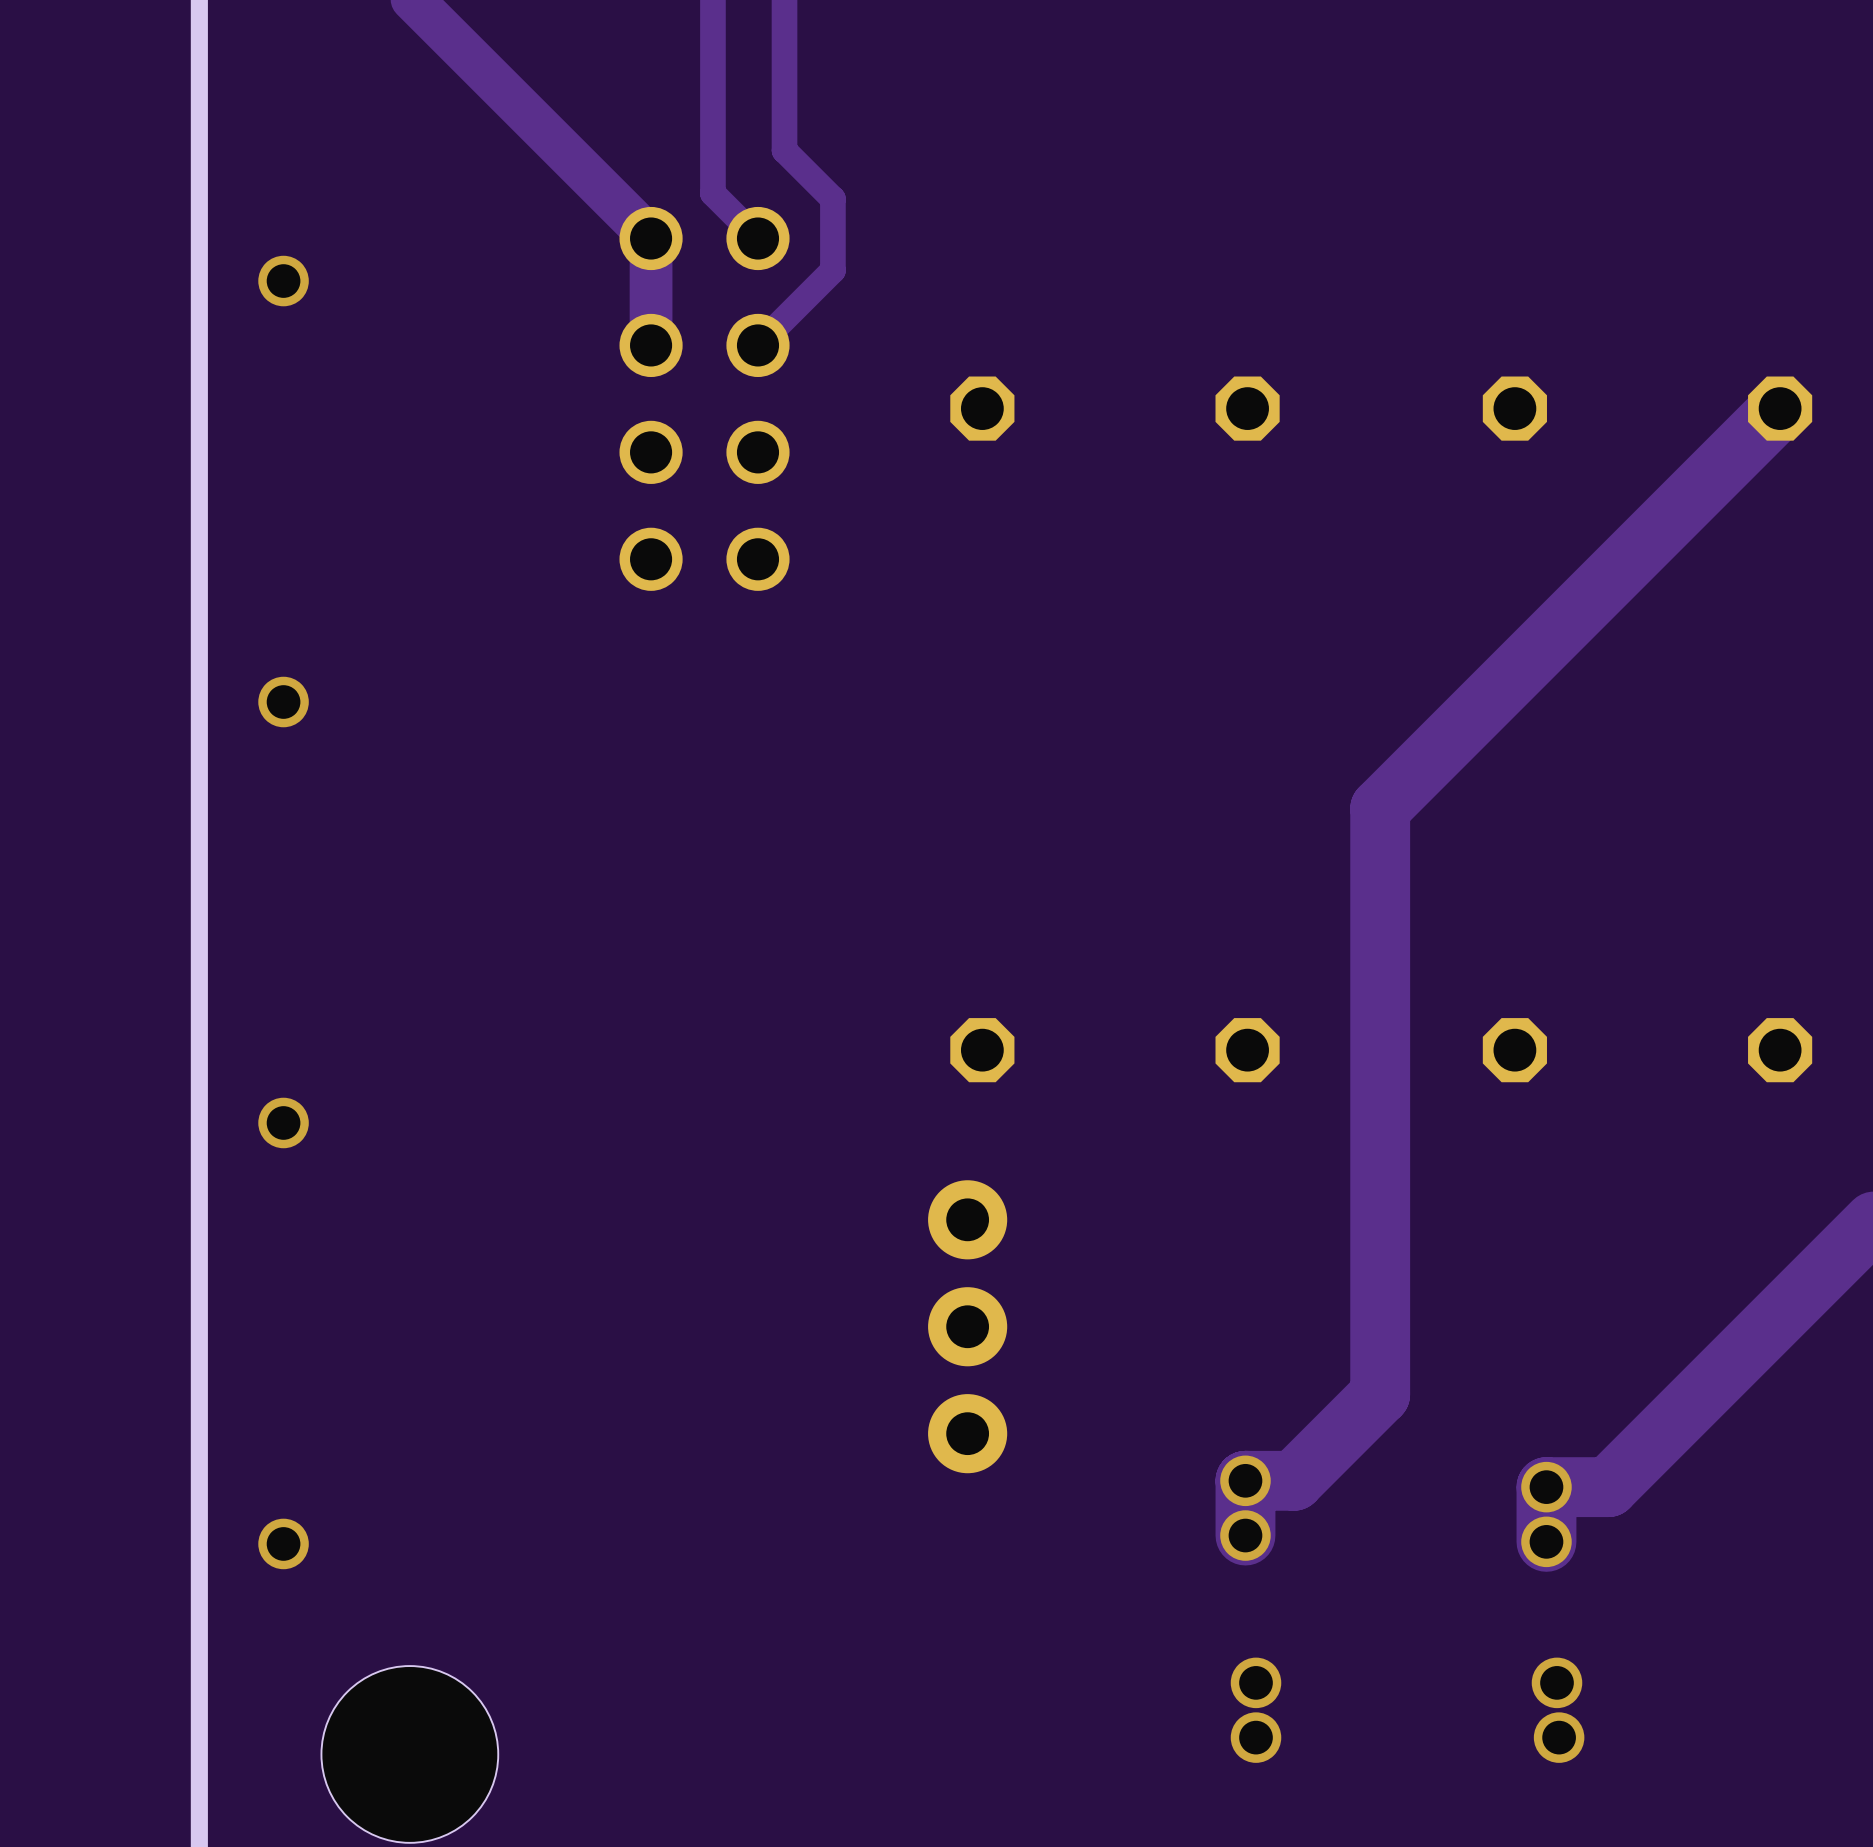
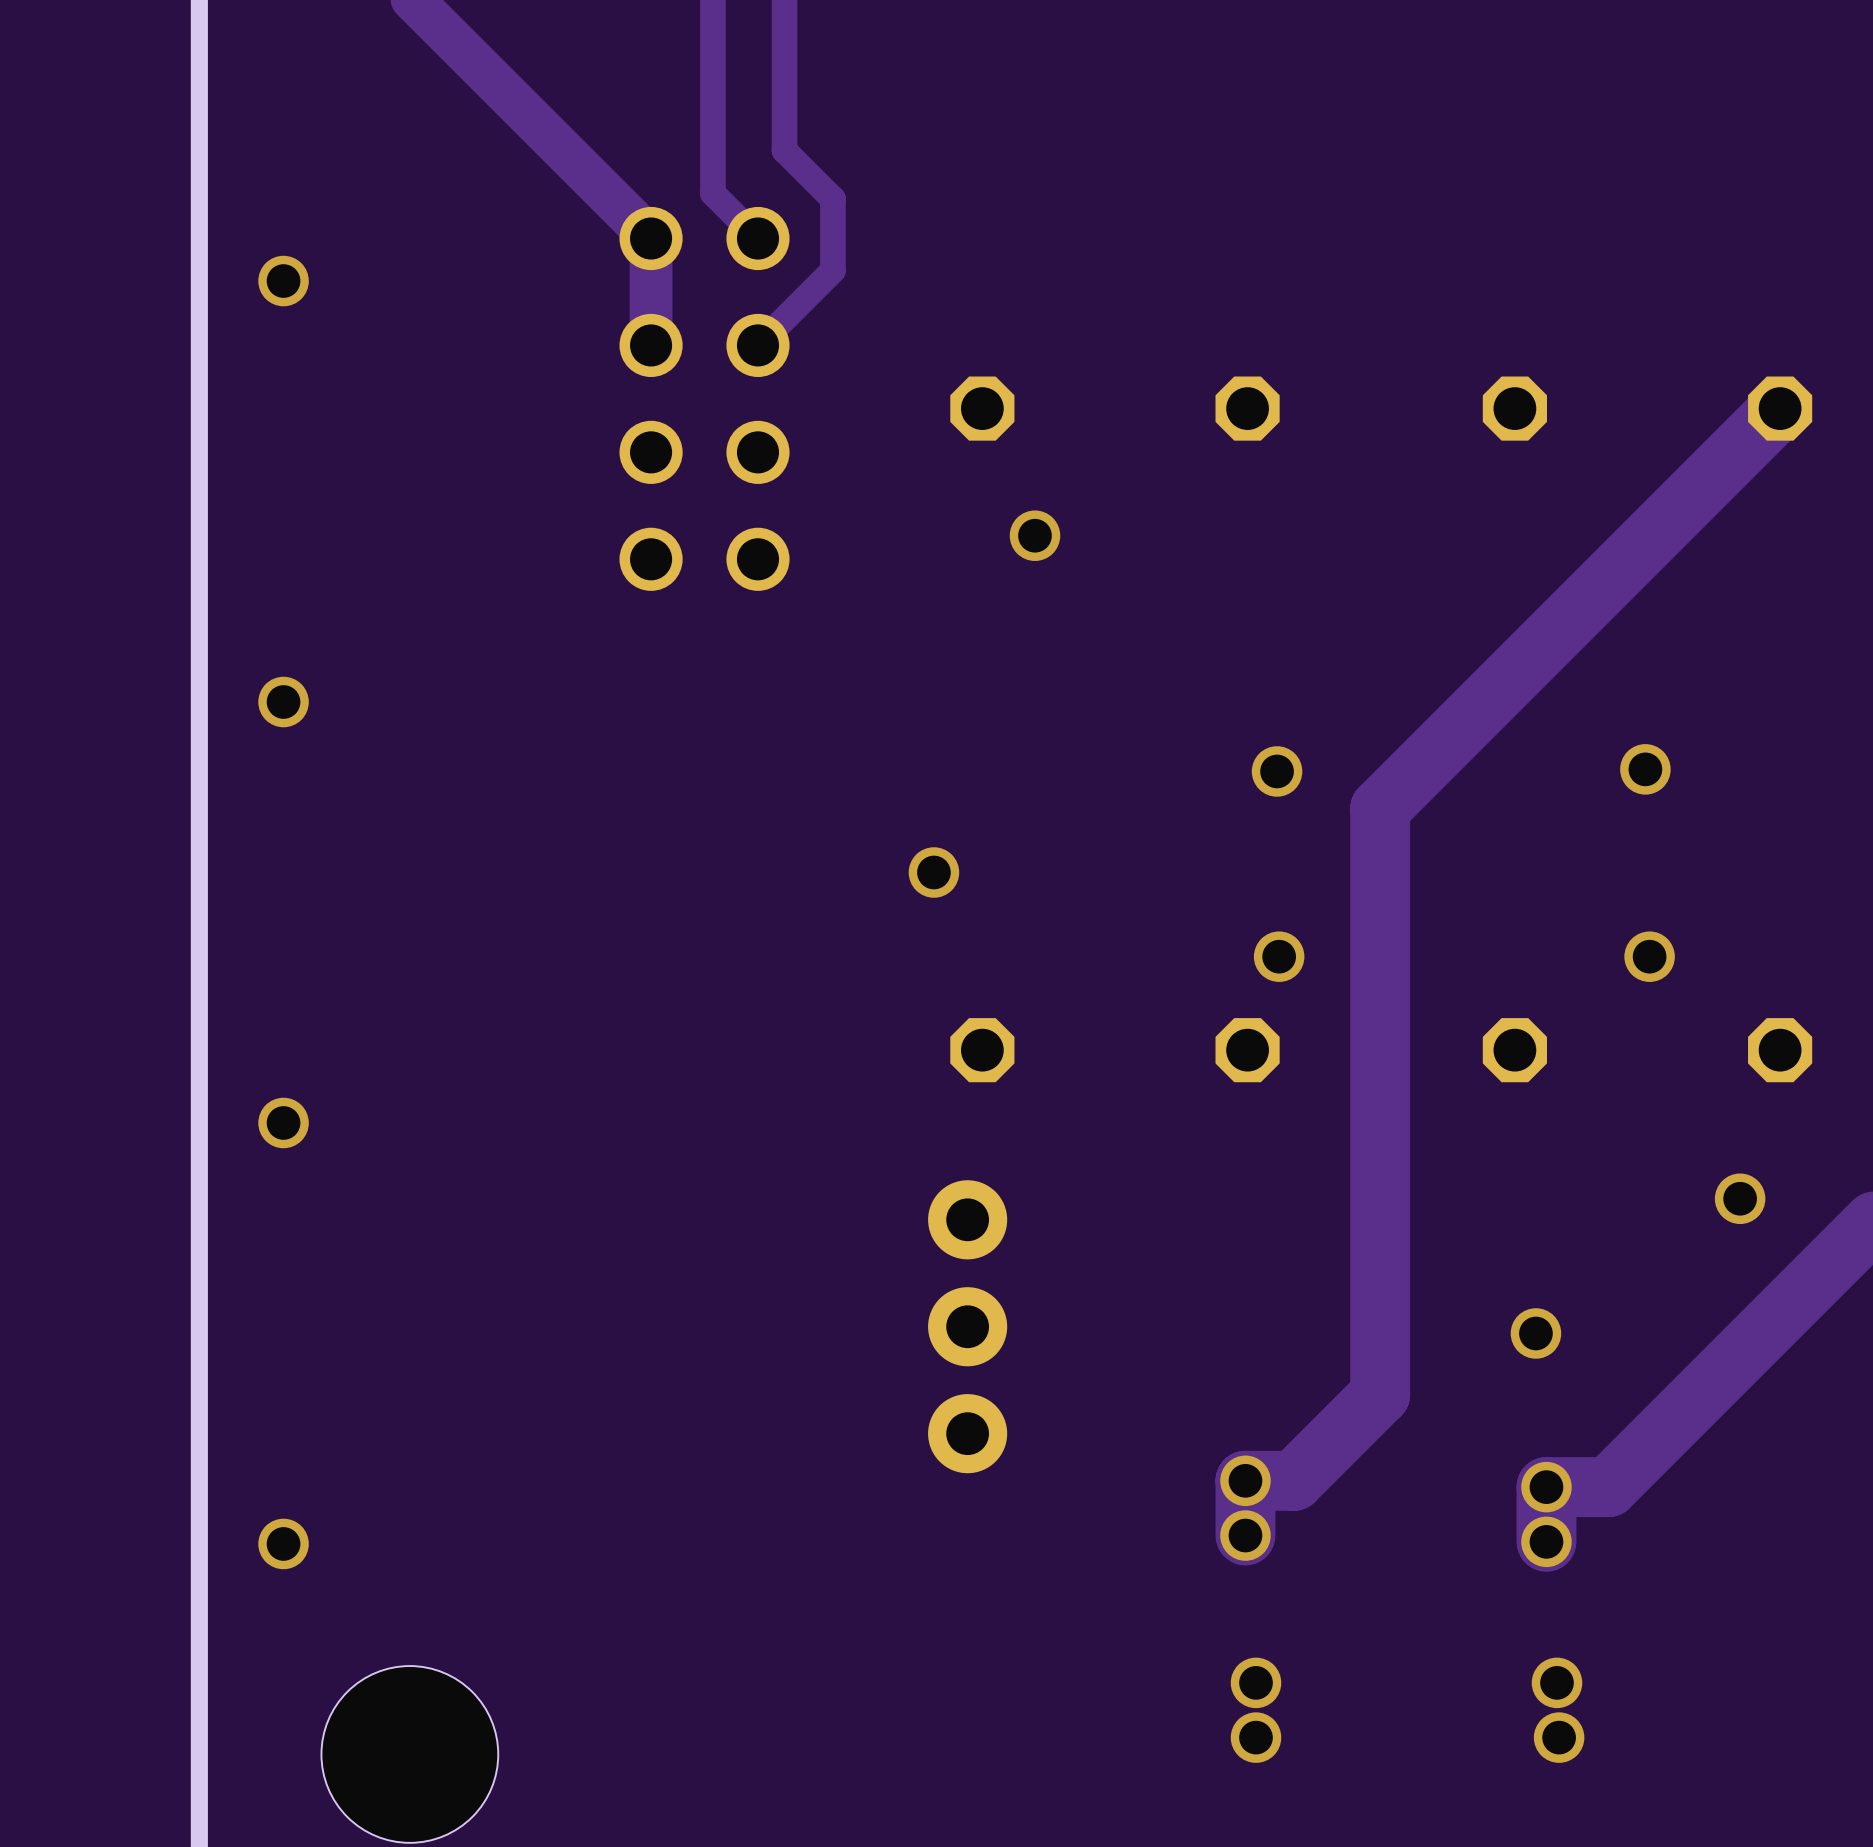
via: none -> (1034, 535)
via: none -> (1645, 769)
via: none -> (1277, 771)
via: none -> (933, 872)
via: none -> (1279, 956)
via: none -> (1649, 956)
via: none -> (1740, 1198)
via: none -> (1535, 1333)

